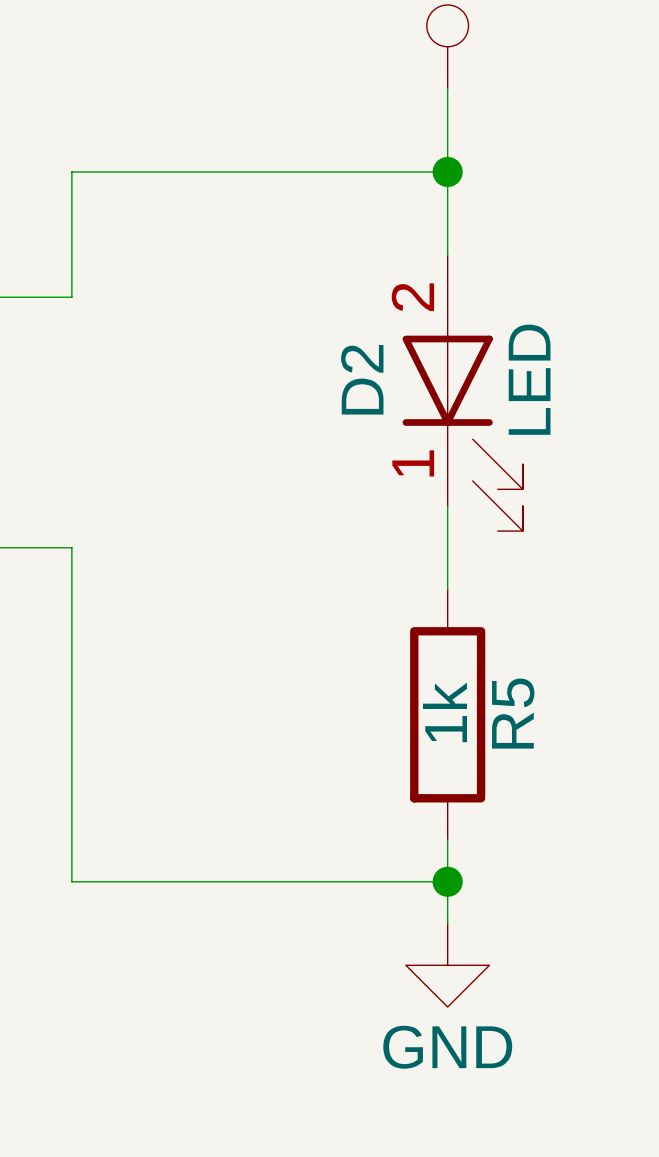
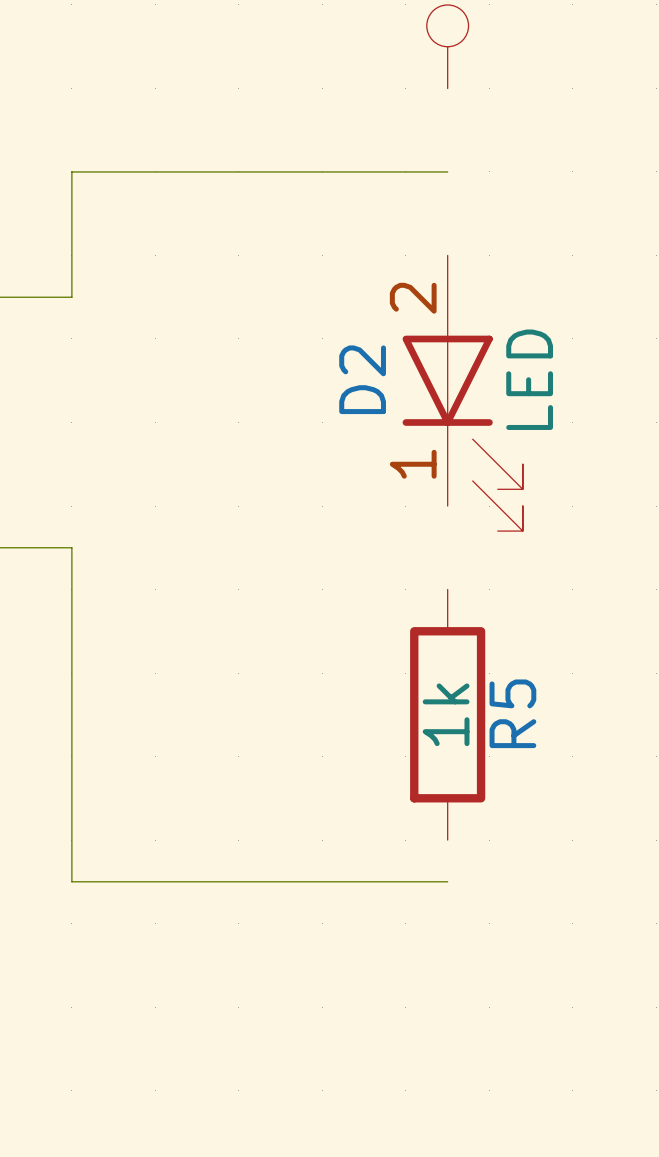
wire: (447, 88) (447, 255) -> none
junction: (447, 171) -> none
wire: (447, 506) (447, 589) -> none
wire: (447, 840) (447, 923) -> none
junction: (447, 881) -> none
power symbol: GND (447, 965) -> none

